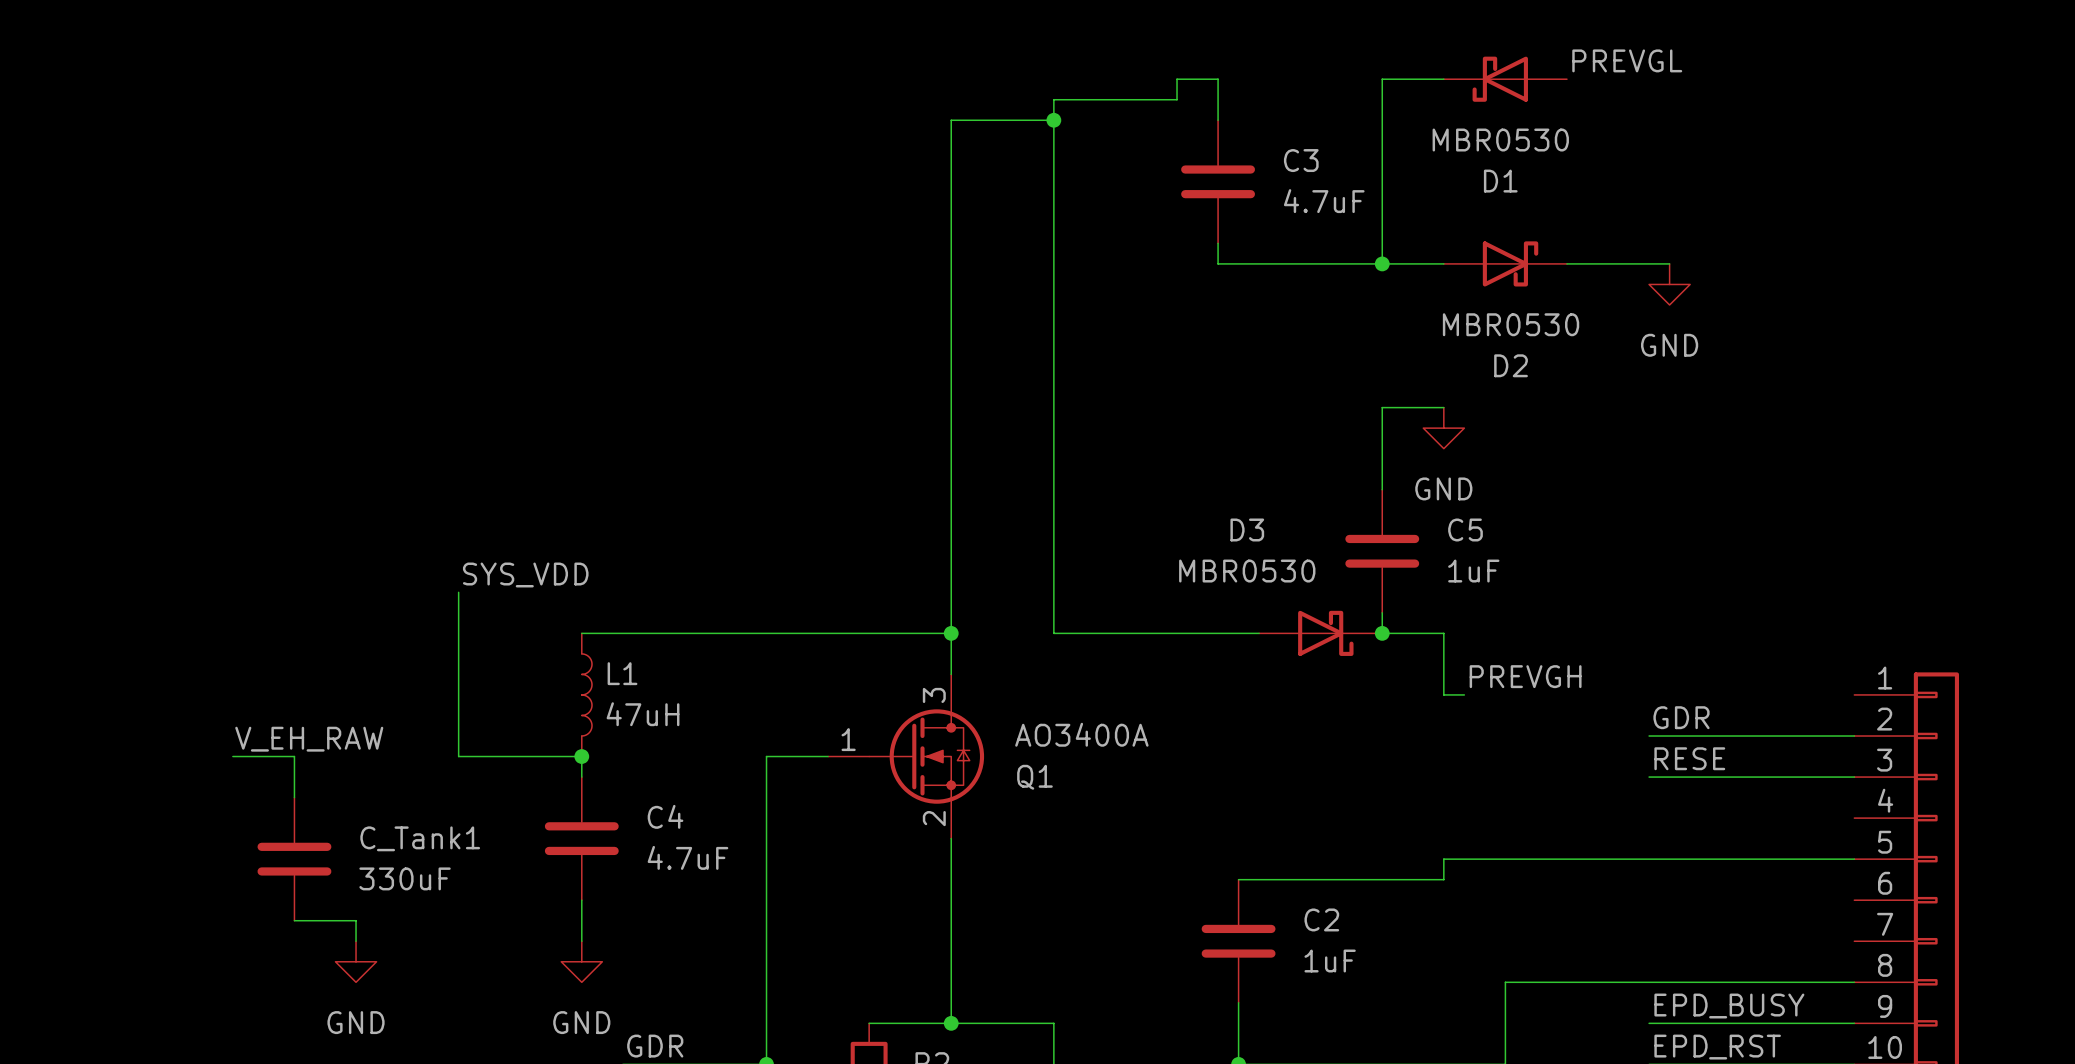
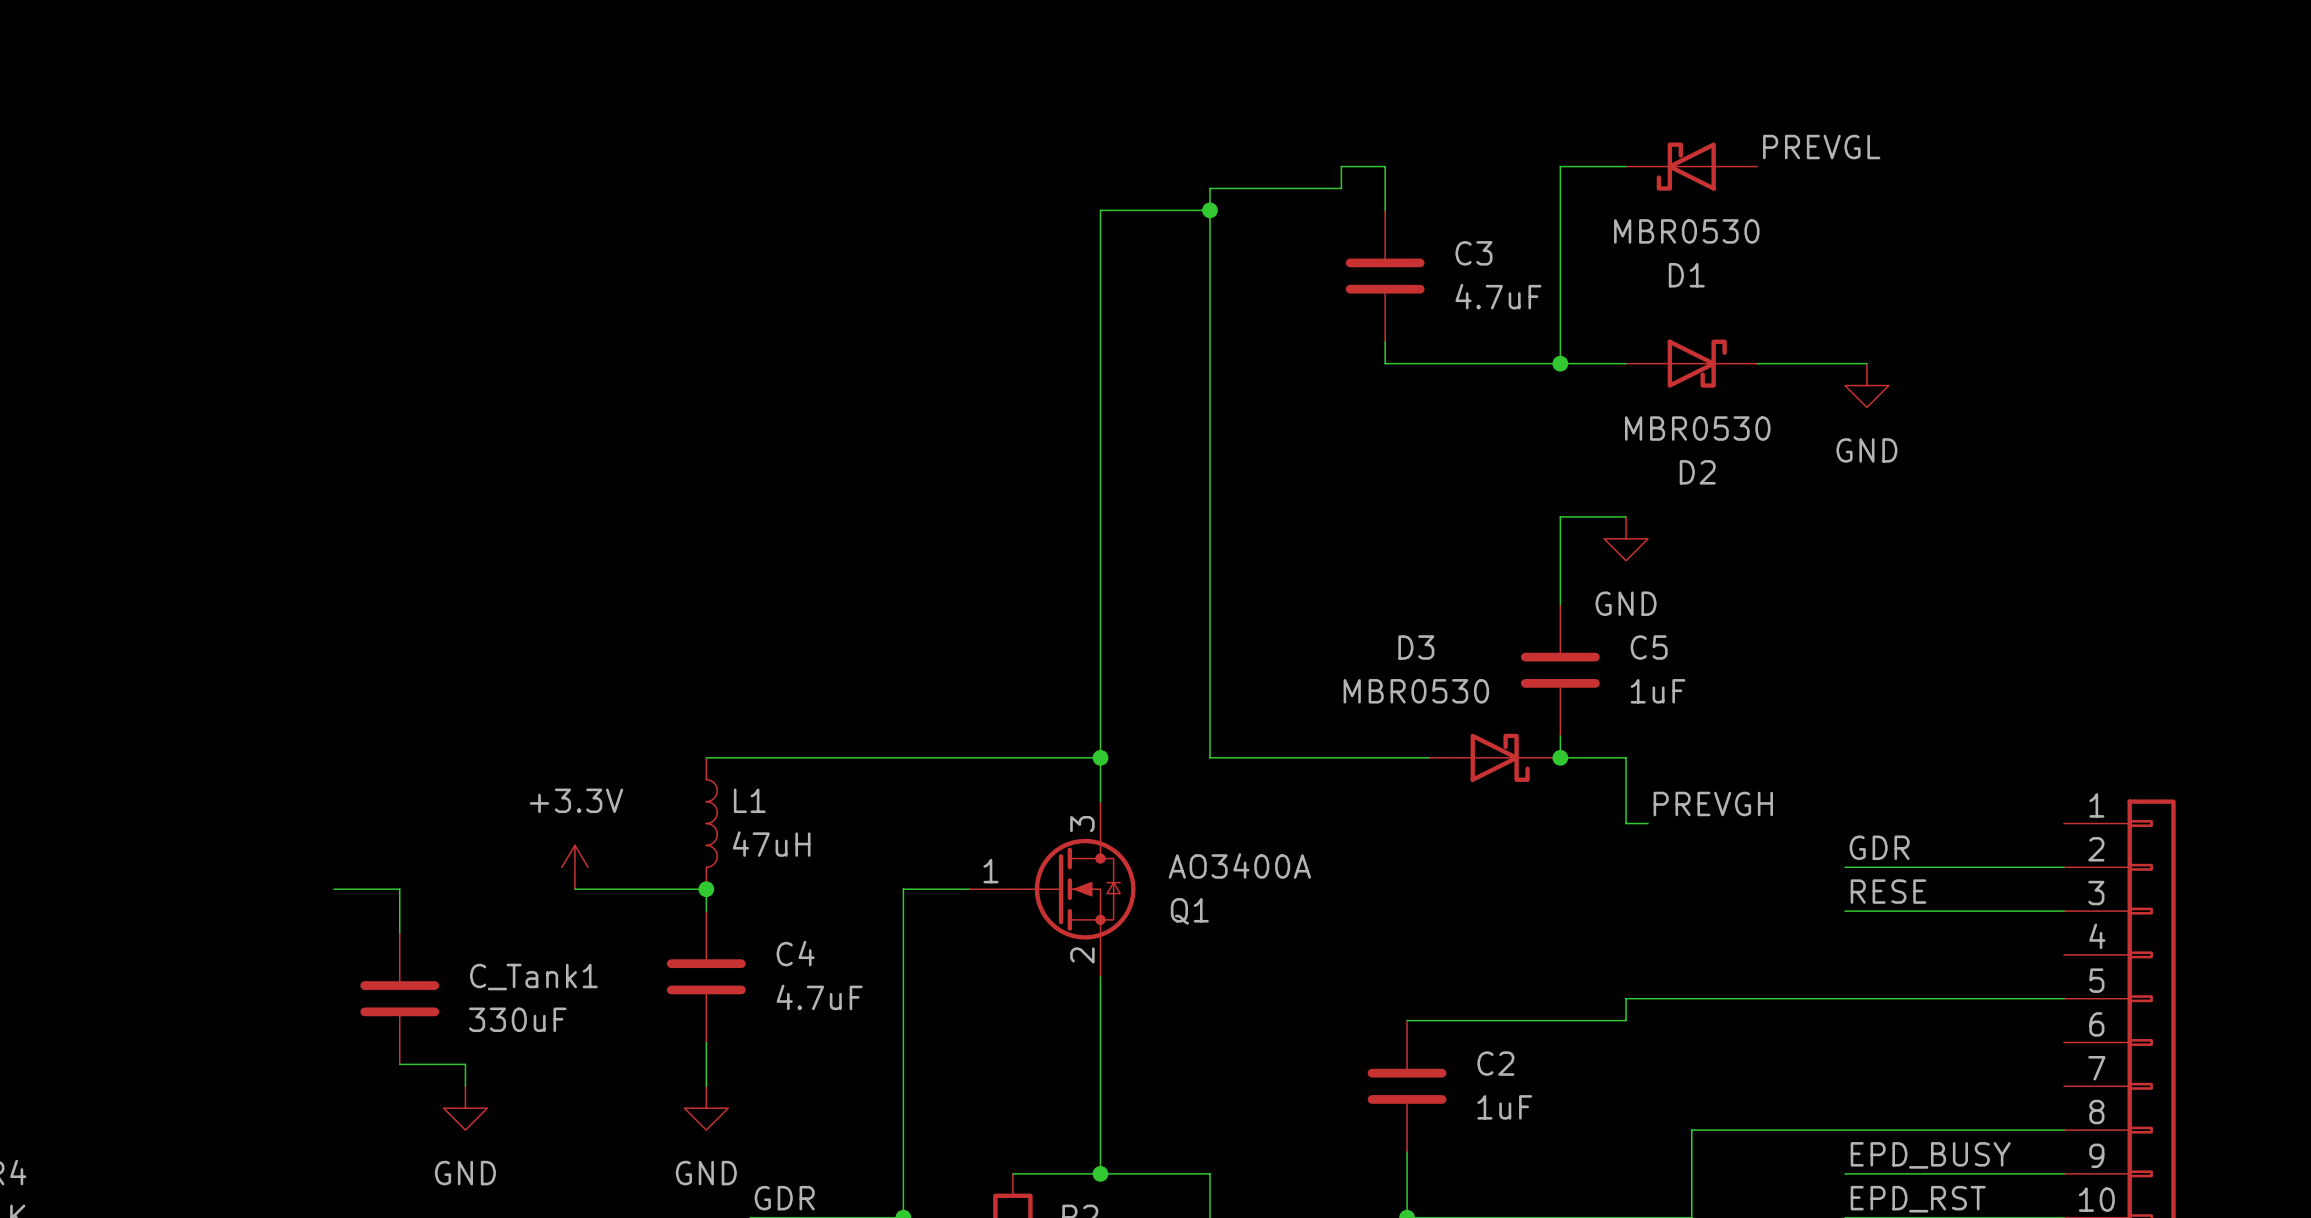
label: SYS_VDD (525, 574) -> none
wire: (458, 592) (458, 756) -> none
power symbol: none -> +3.3V (574, 867)
label: V_EH_RAW (309, 739) -> none

